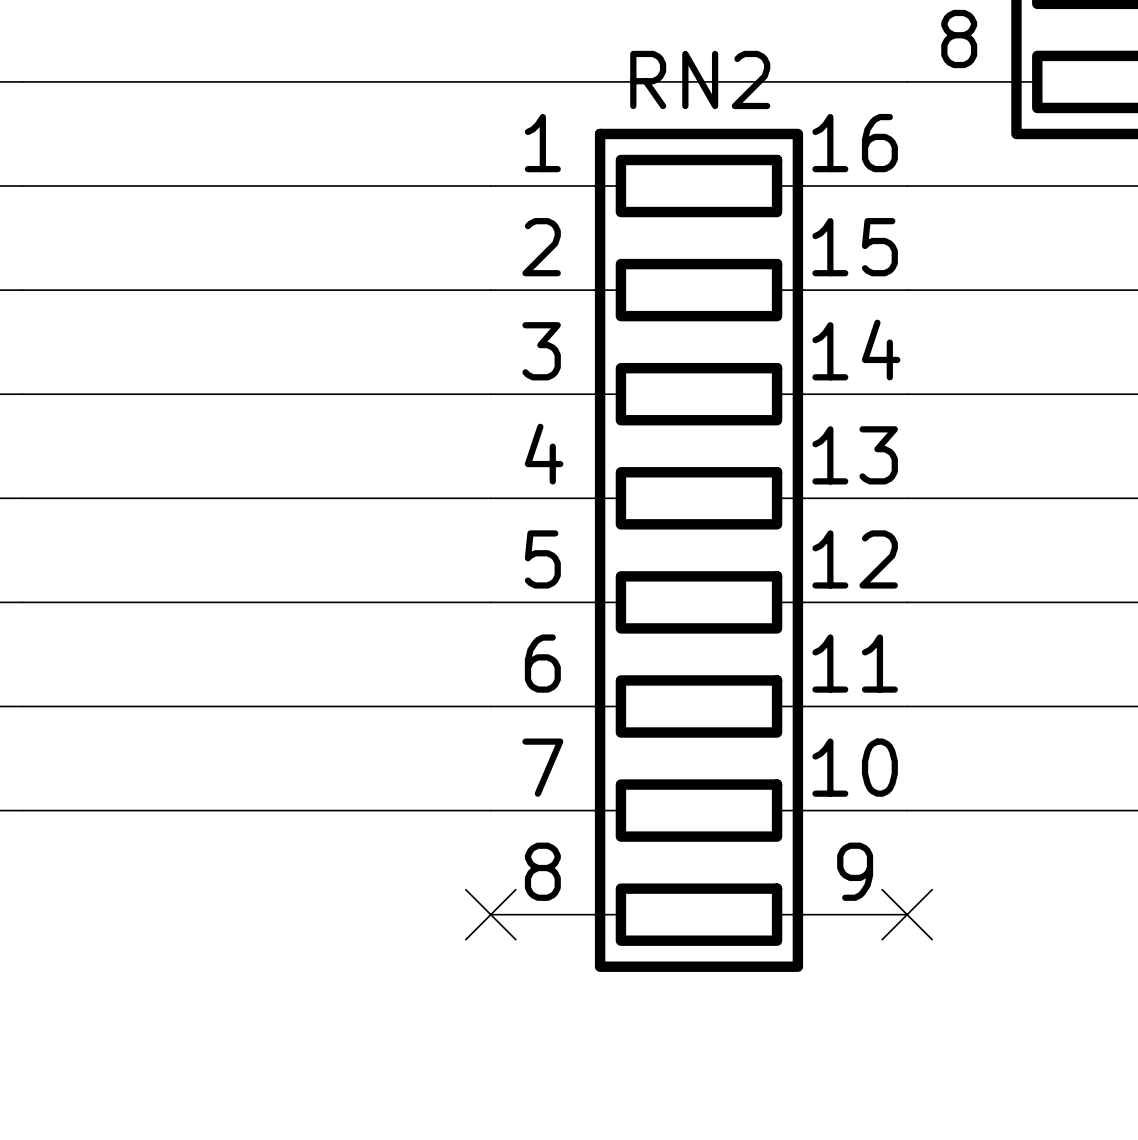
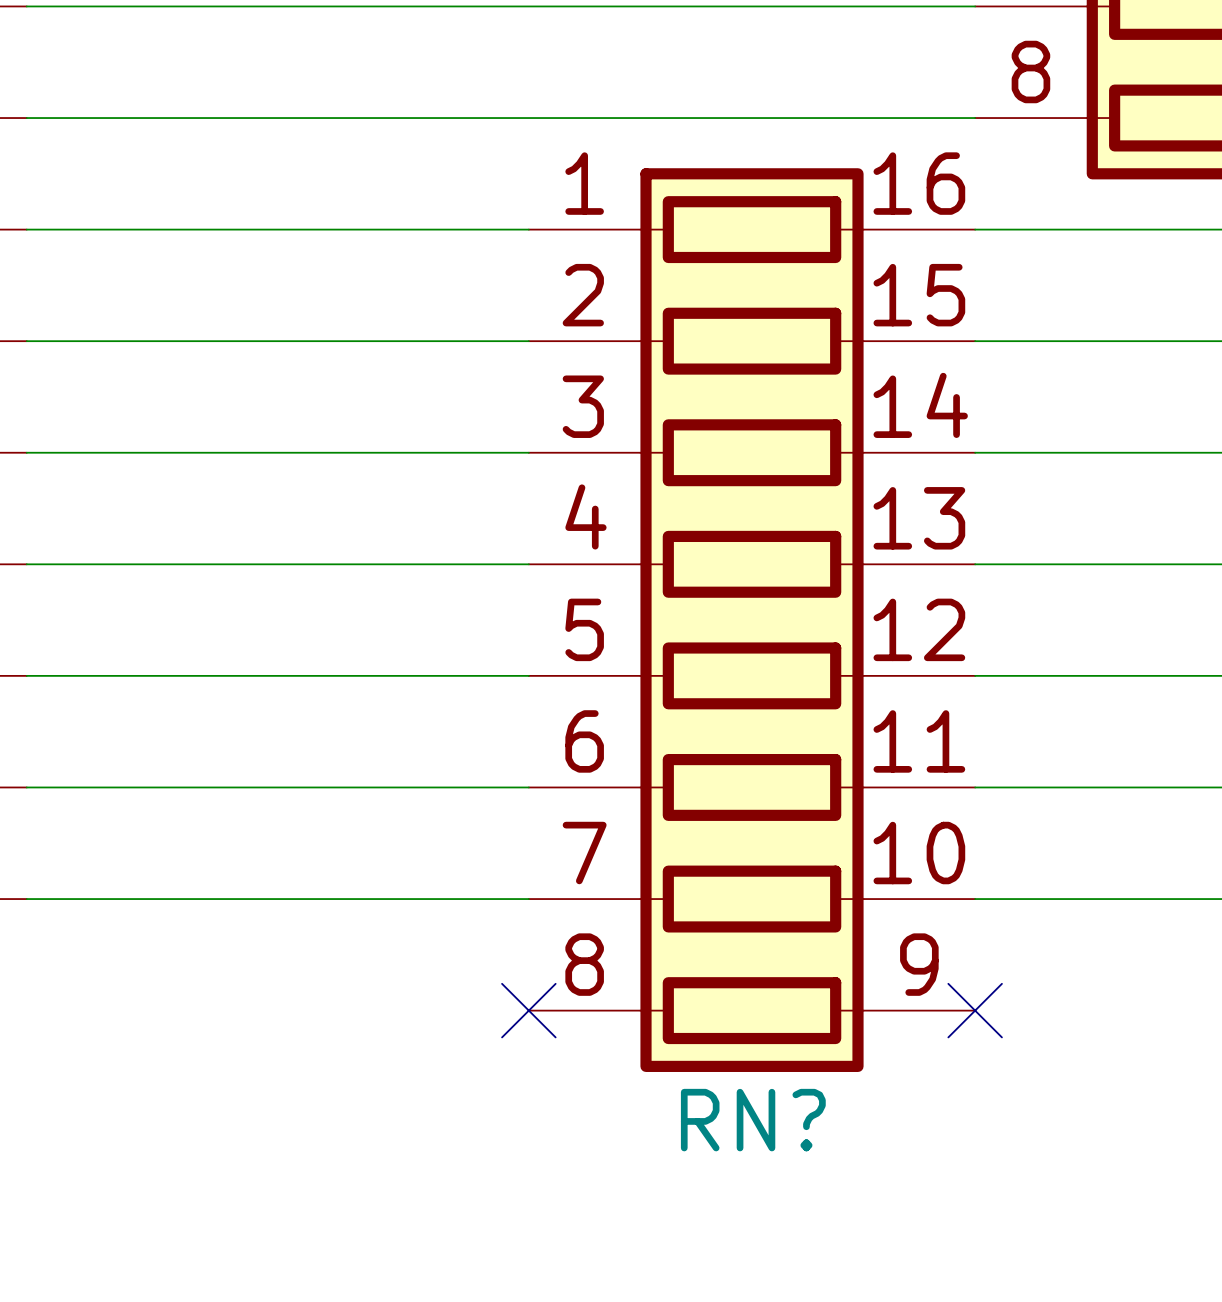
RN2 name: RN2 (700, 79) -> RN? (753, 1120)

